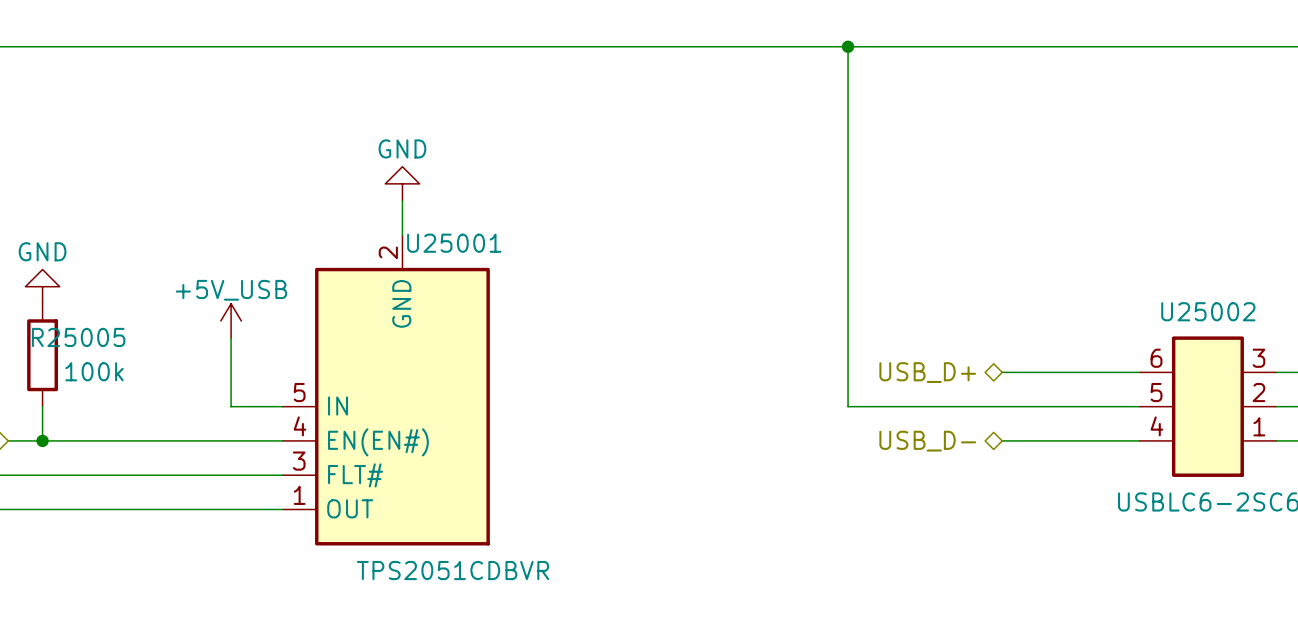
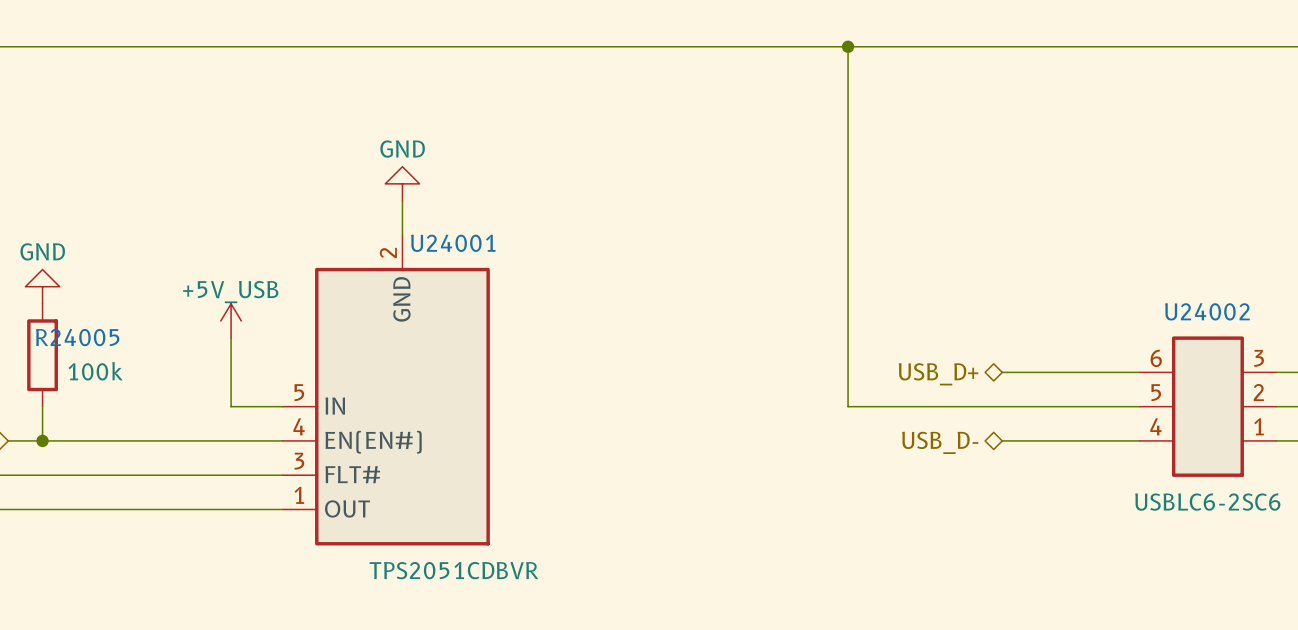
U25001 name: U25001 (454, 243) -> U24001 (453, 243)
U25002 name: U25002 (1208, 311) -> U24002 (1207, 311)
R25005 name: R25005 (78, 337) -> R24005 (77, 337)

